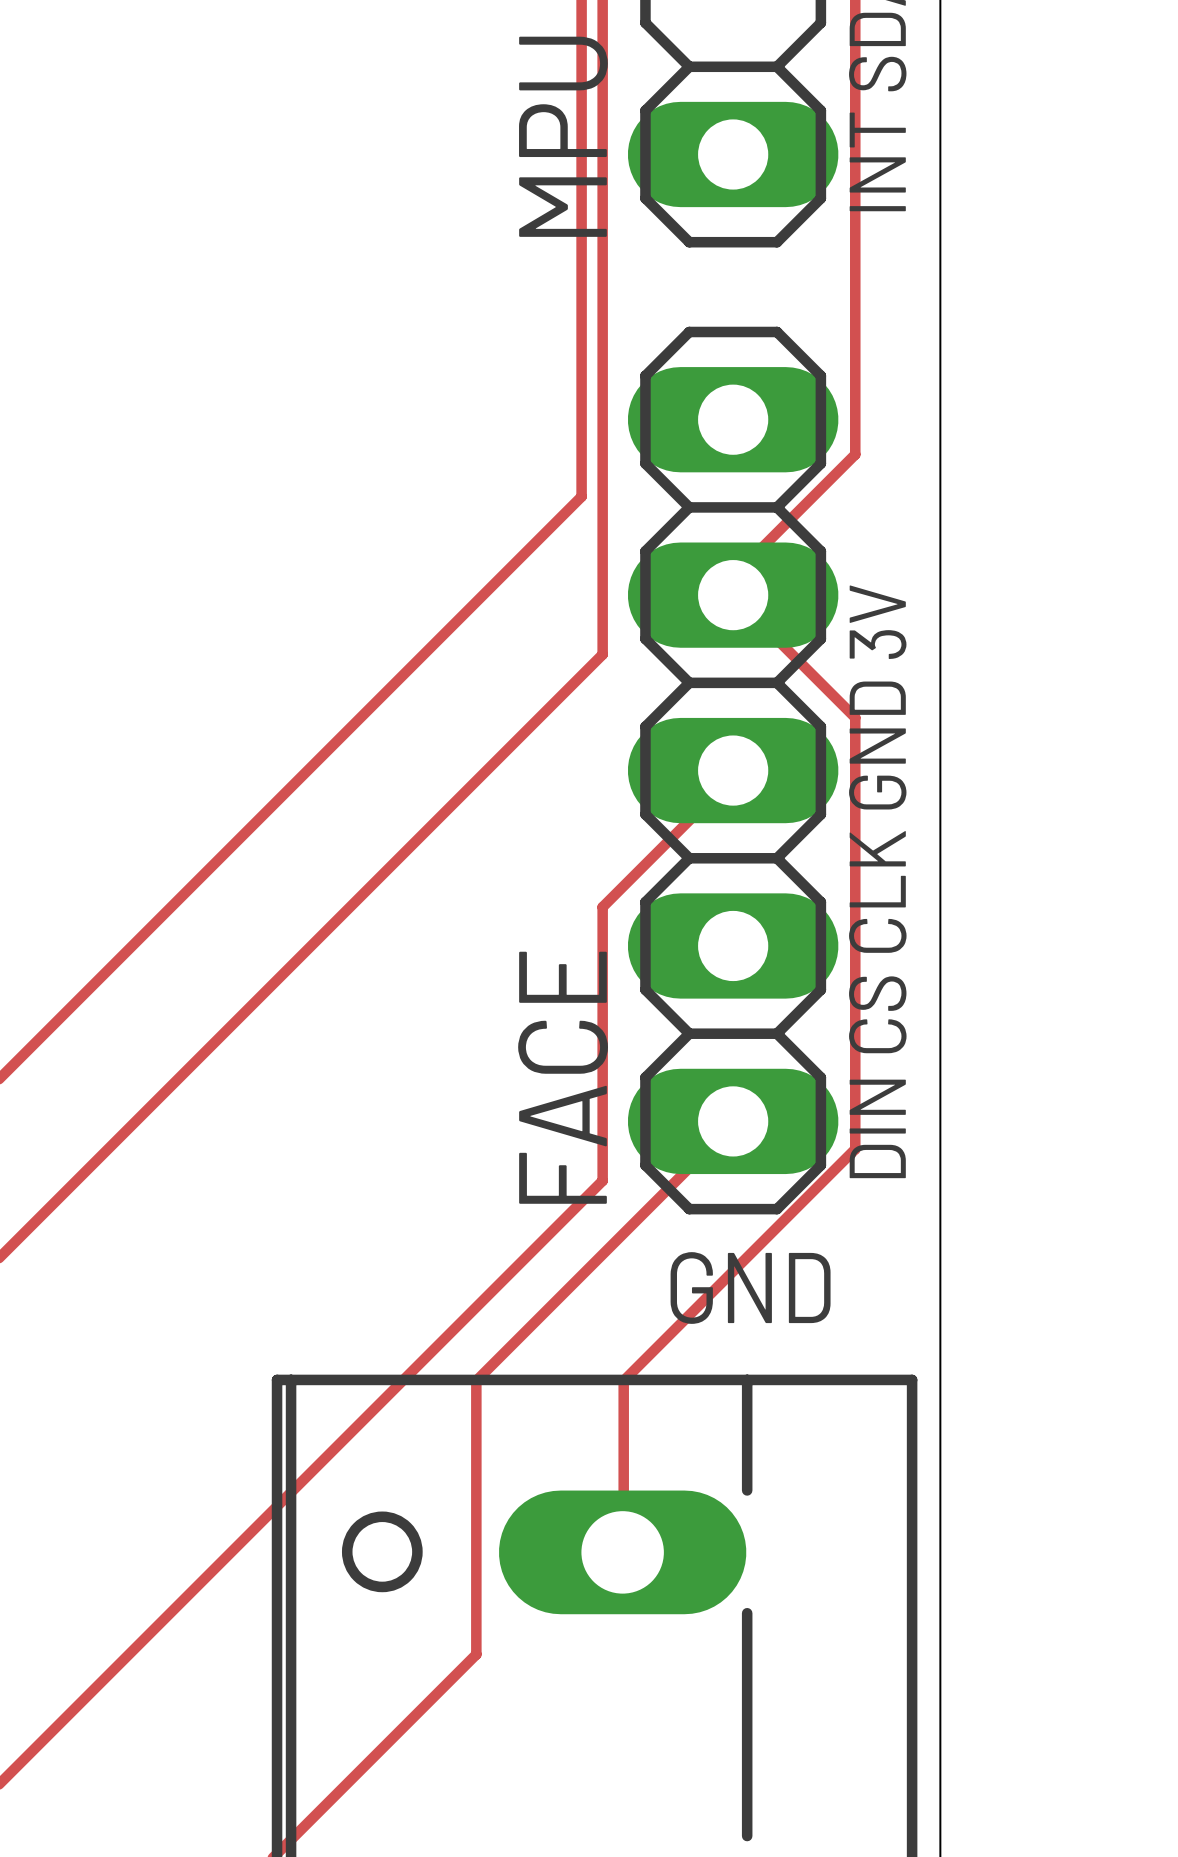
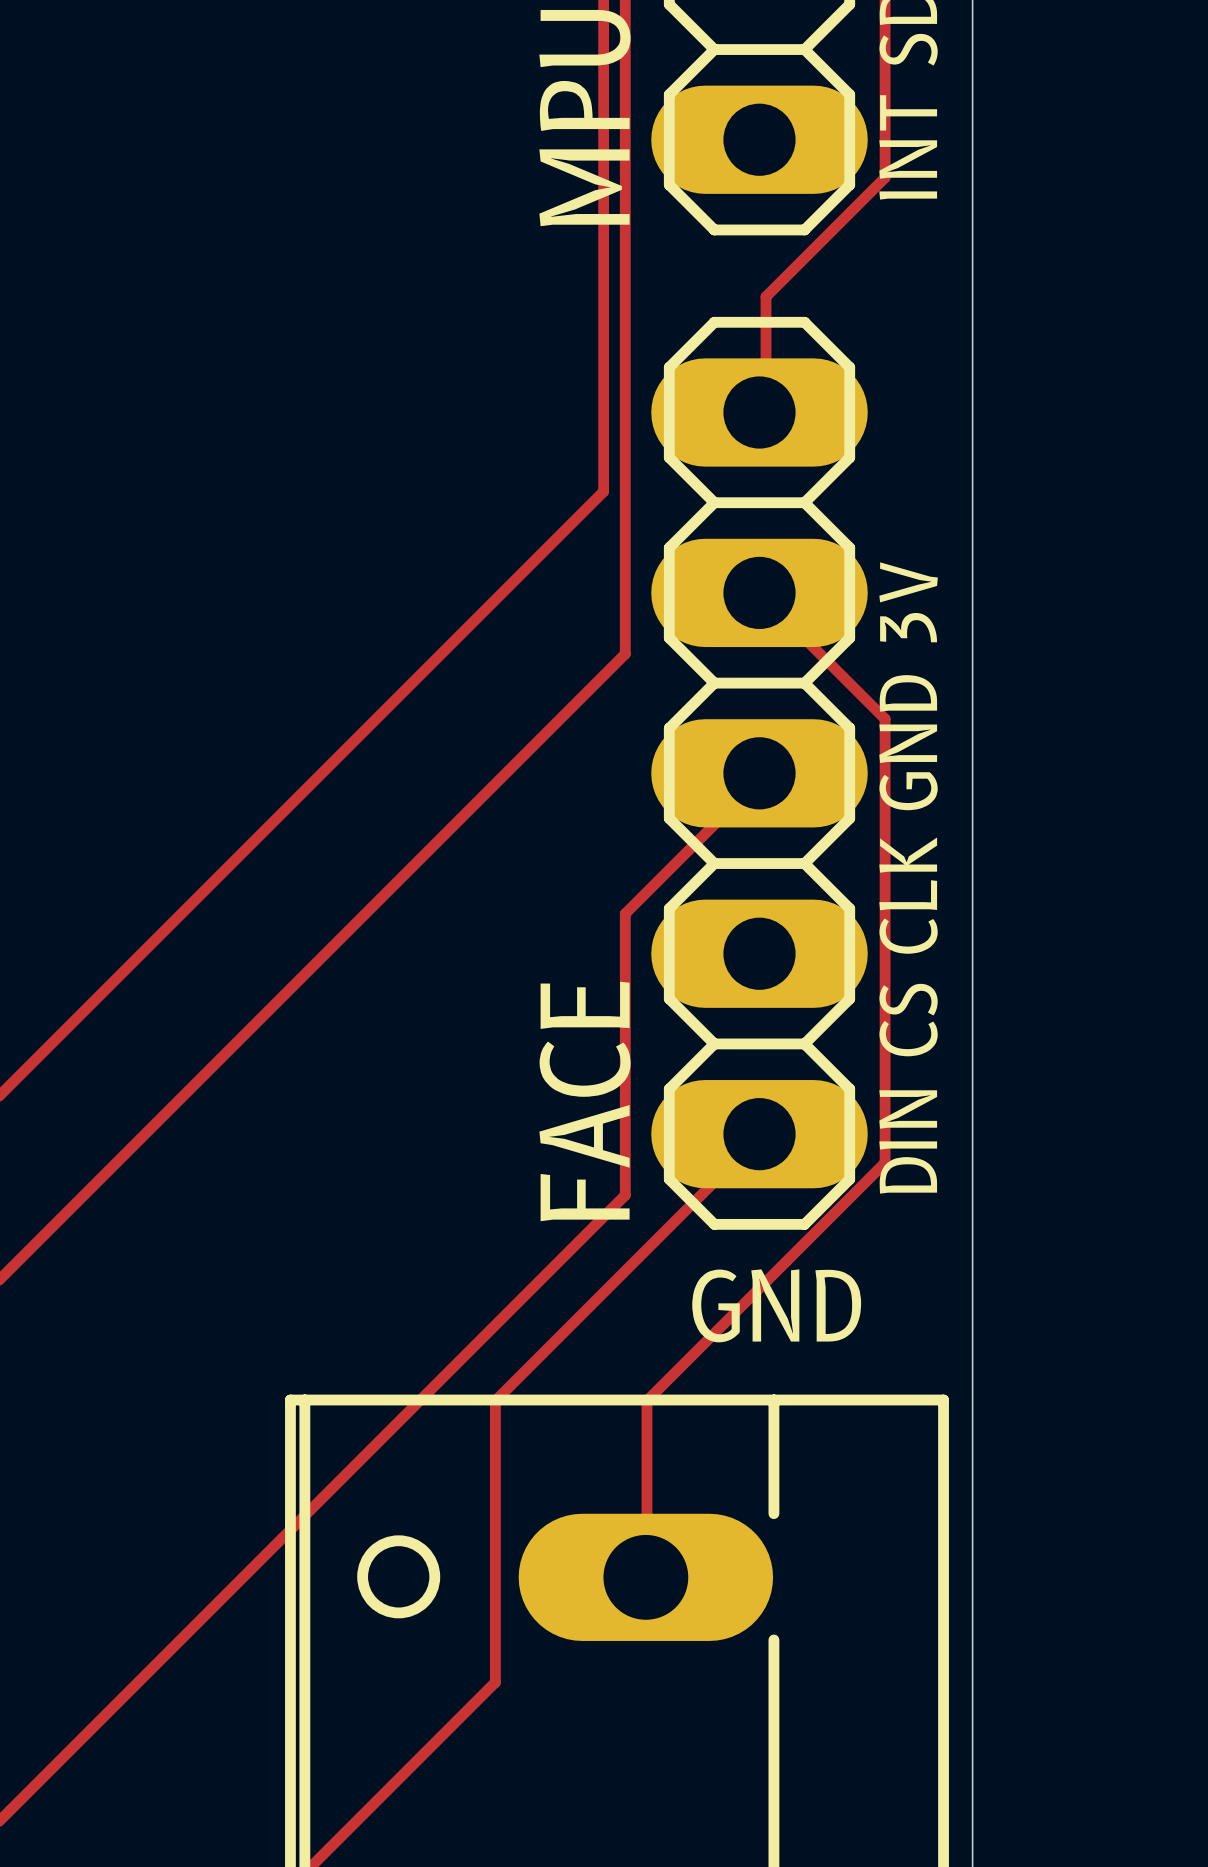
track: (855, 191) (855, 454) (739, 570) (739, 591) (733, 595) -> (885, 177) (766, 296) (766, 405) (759, 412)

